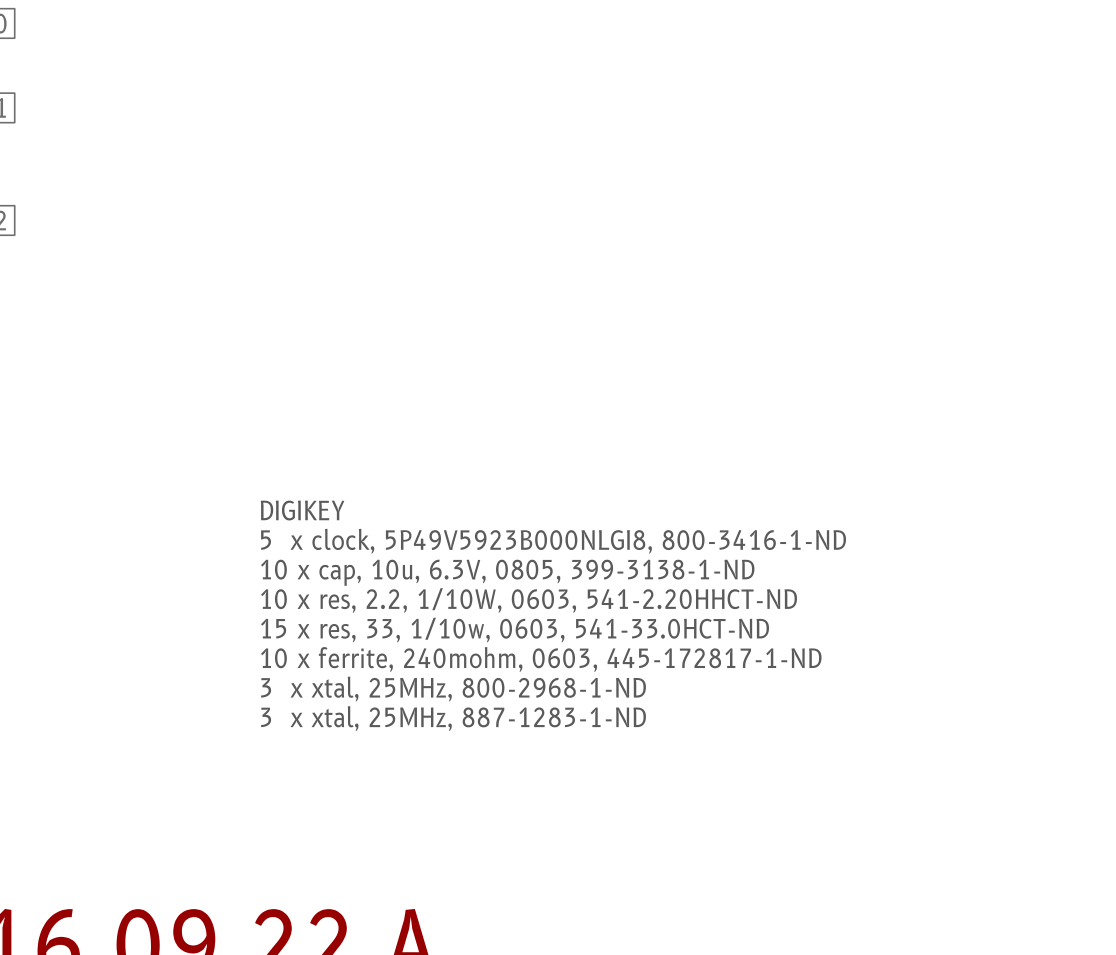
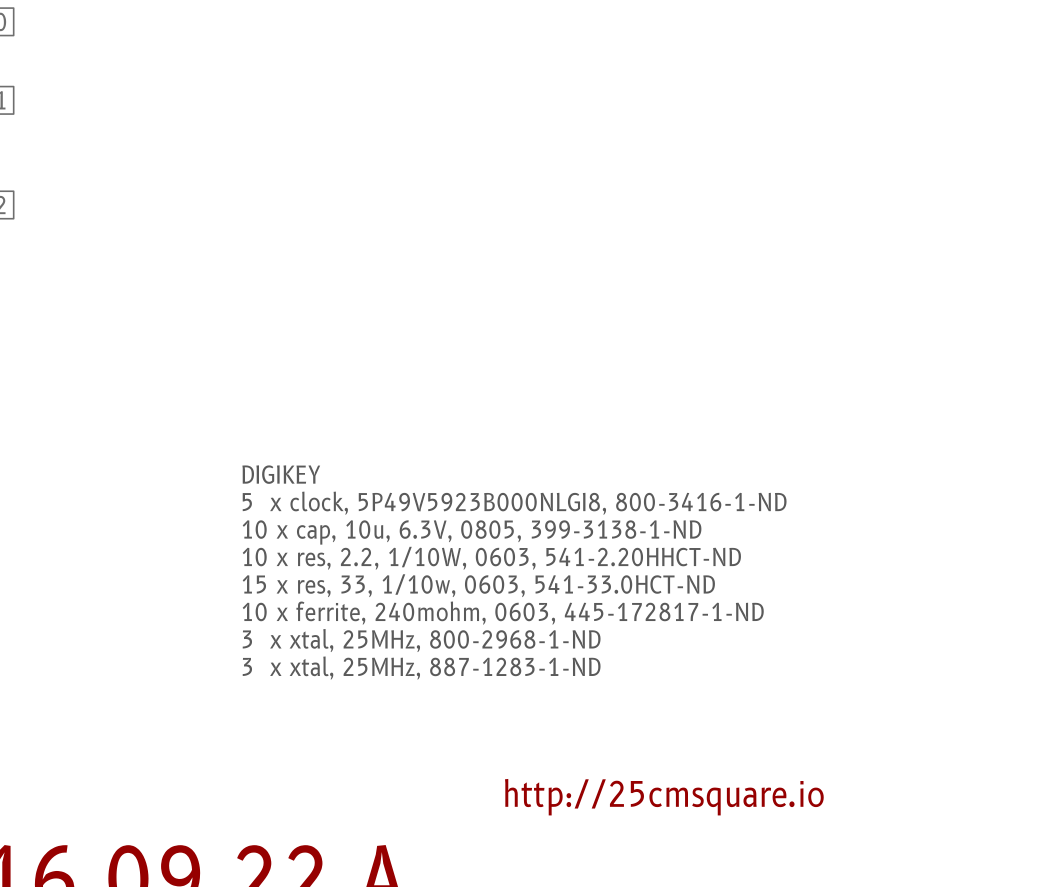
text: none -> http://25cmsquare.io (664, 797)

